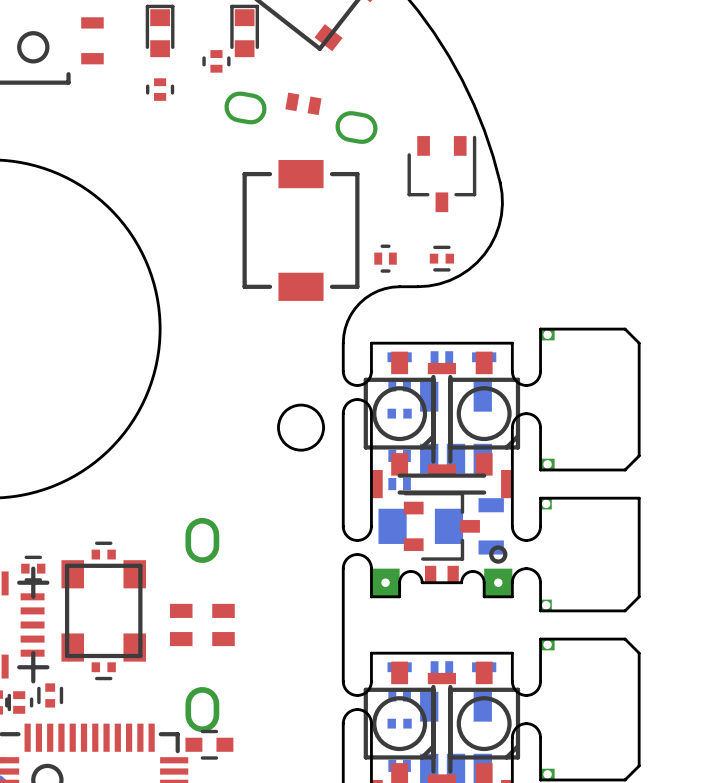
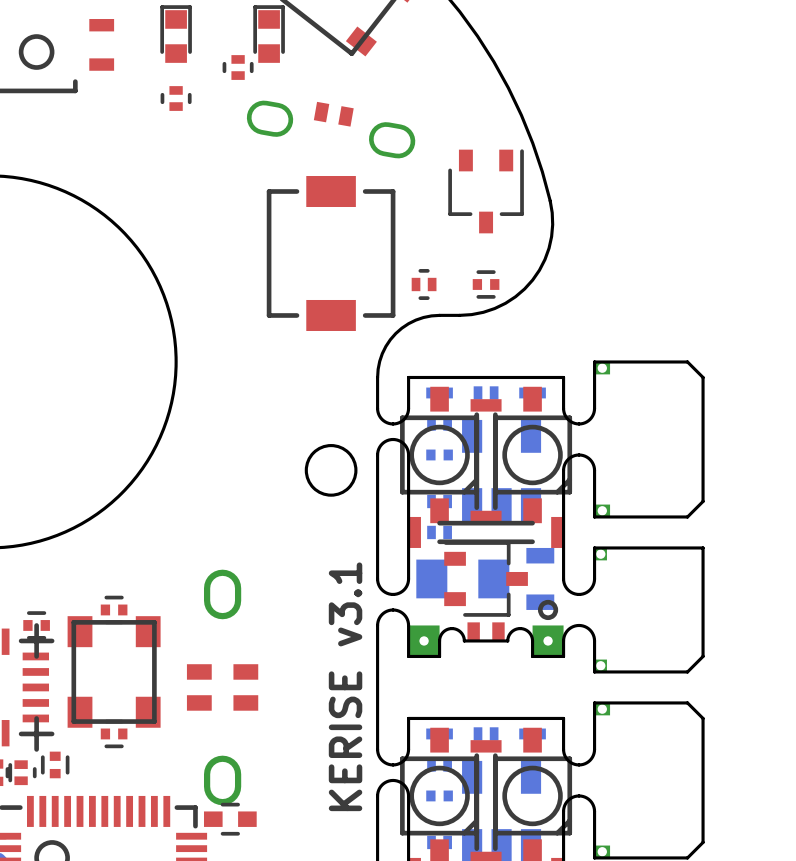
text: none -> KERISE v3.1 (345, 686)

